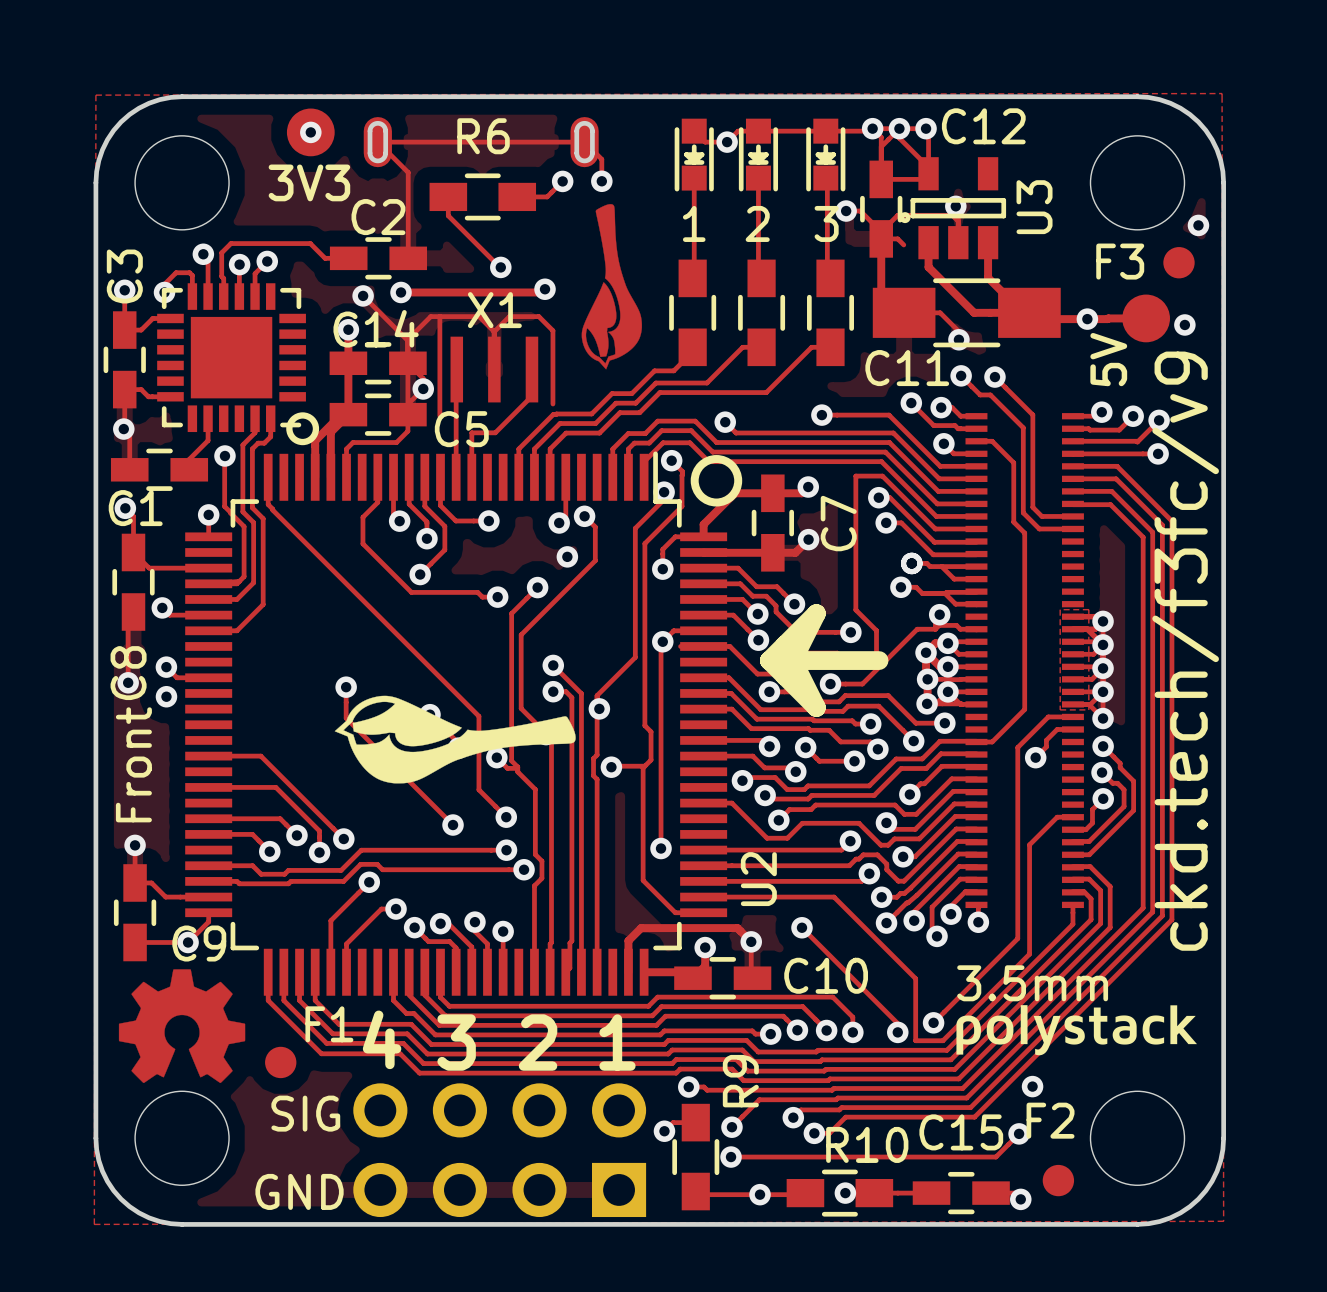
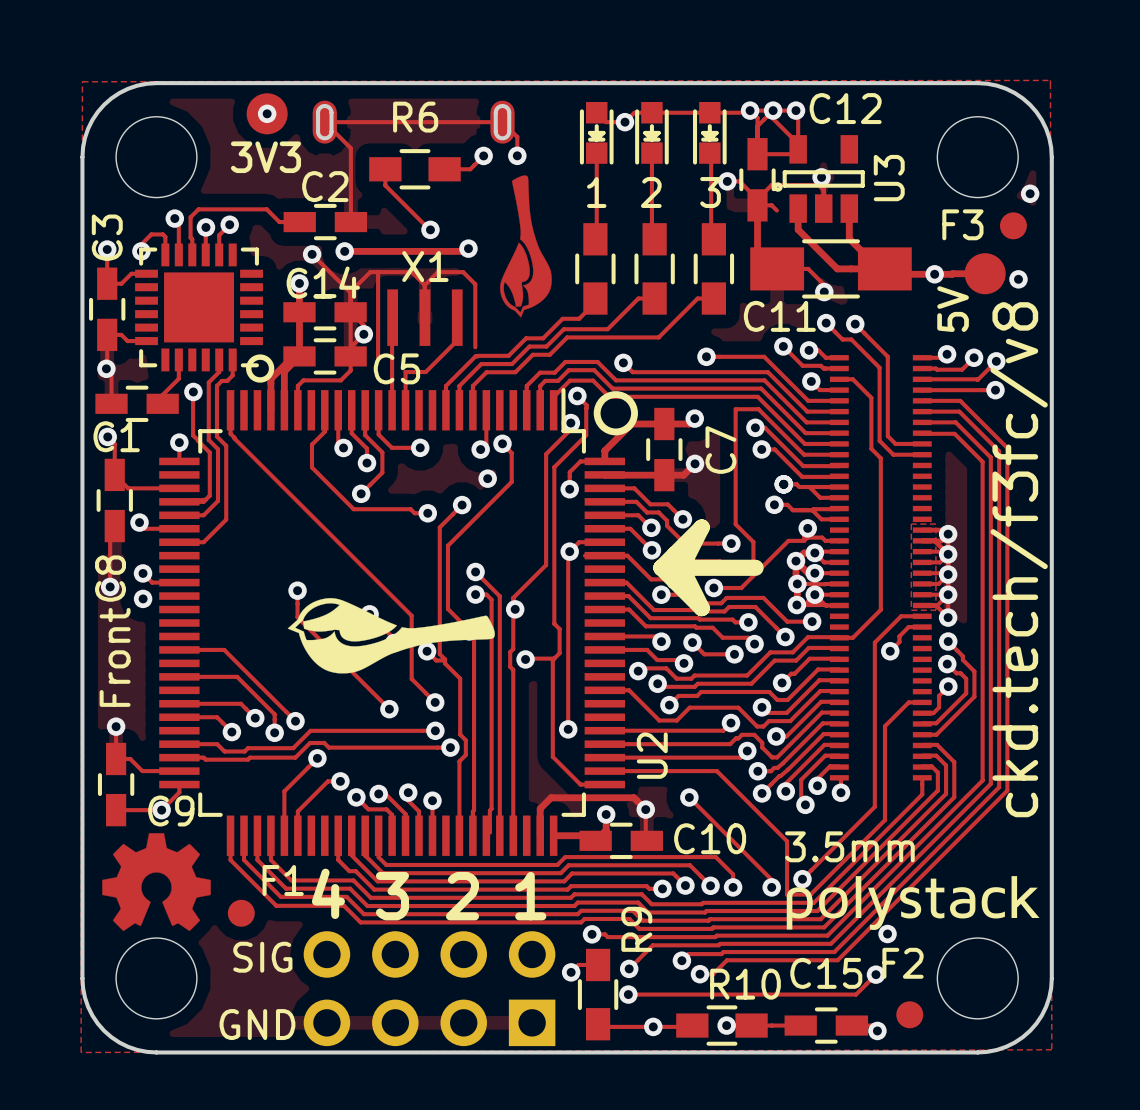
text: ckd.tech/f3fc/v9 (1185, 651) -> ckd.tech/f3fc/v8 (1019, 559)
text position: 3.5mm (1032, 983) -> 3.5mm (849, 846)
drawing shape: [956, 1005, 1197, 1056] -> [786, 876, 1040, 930]

